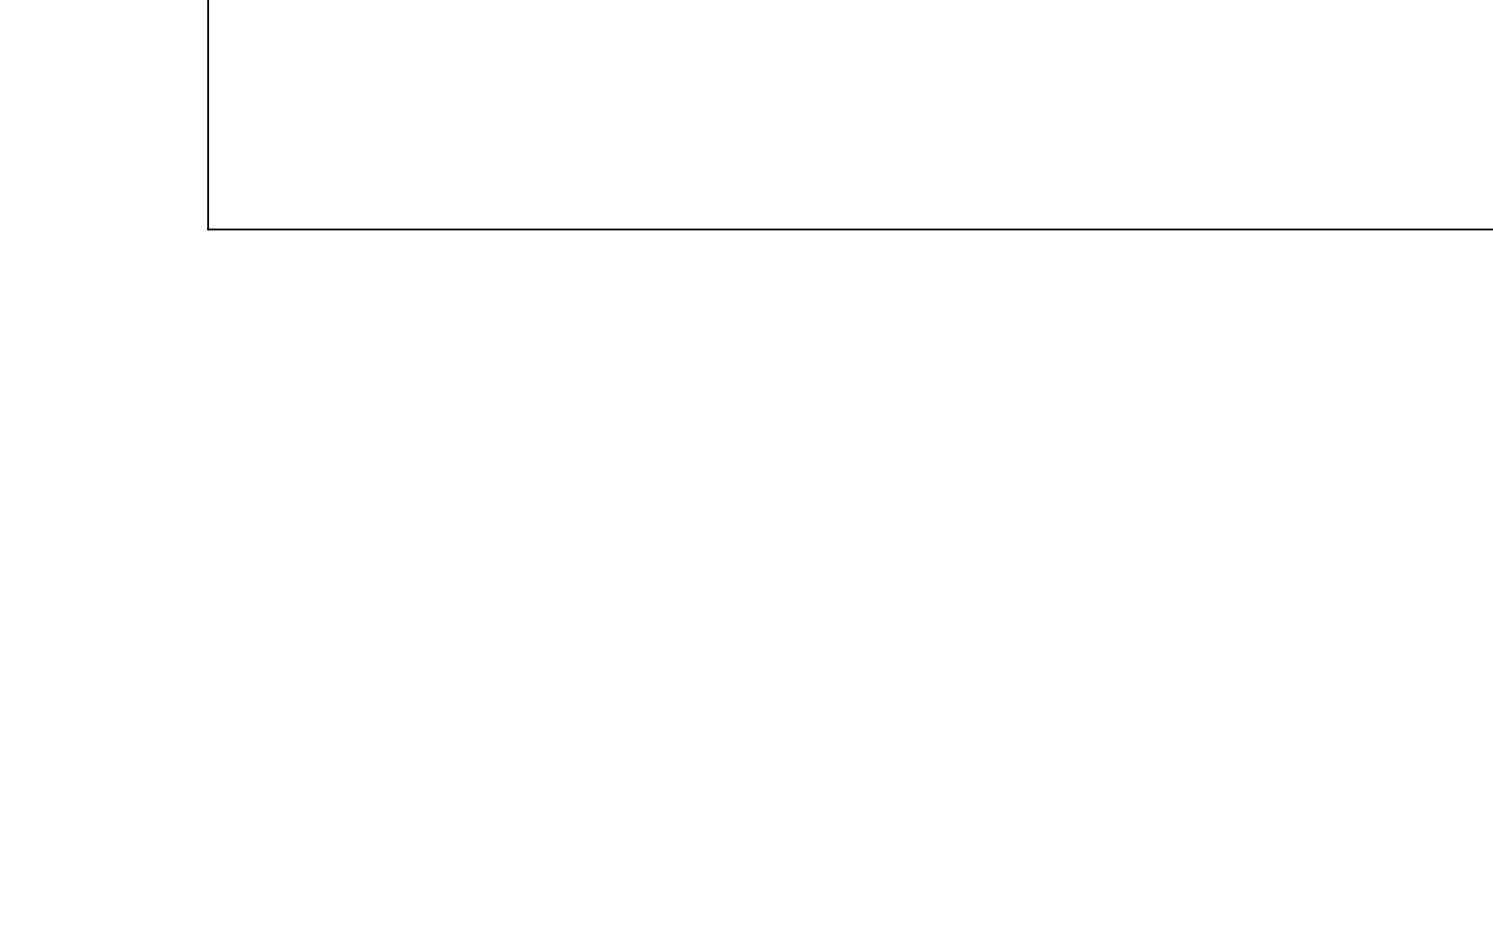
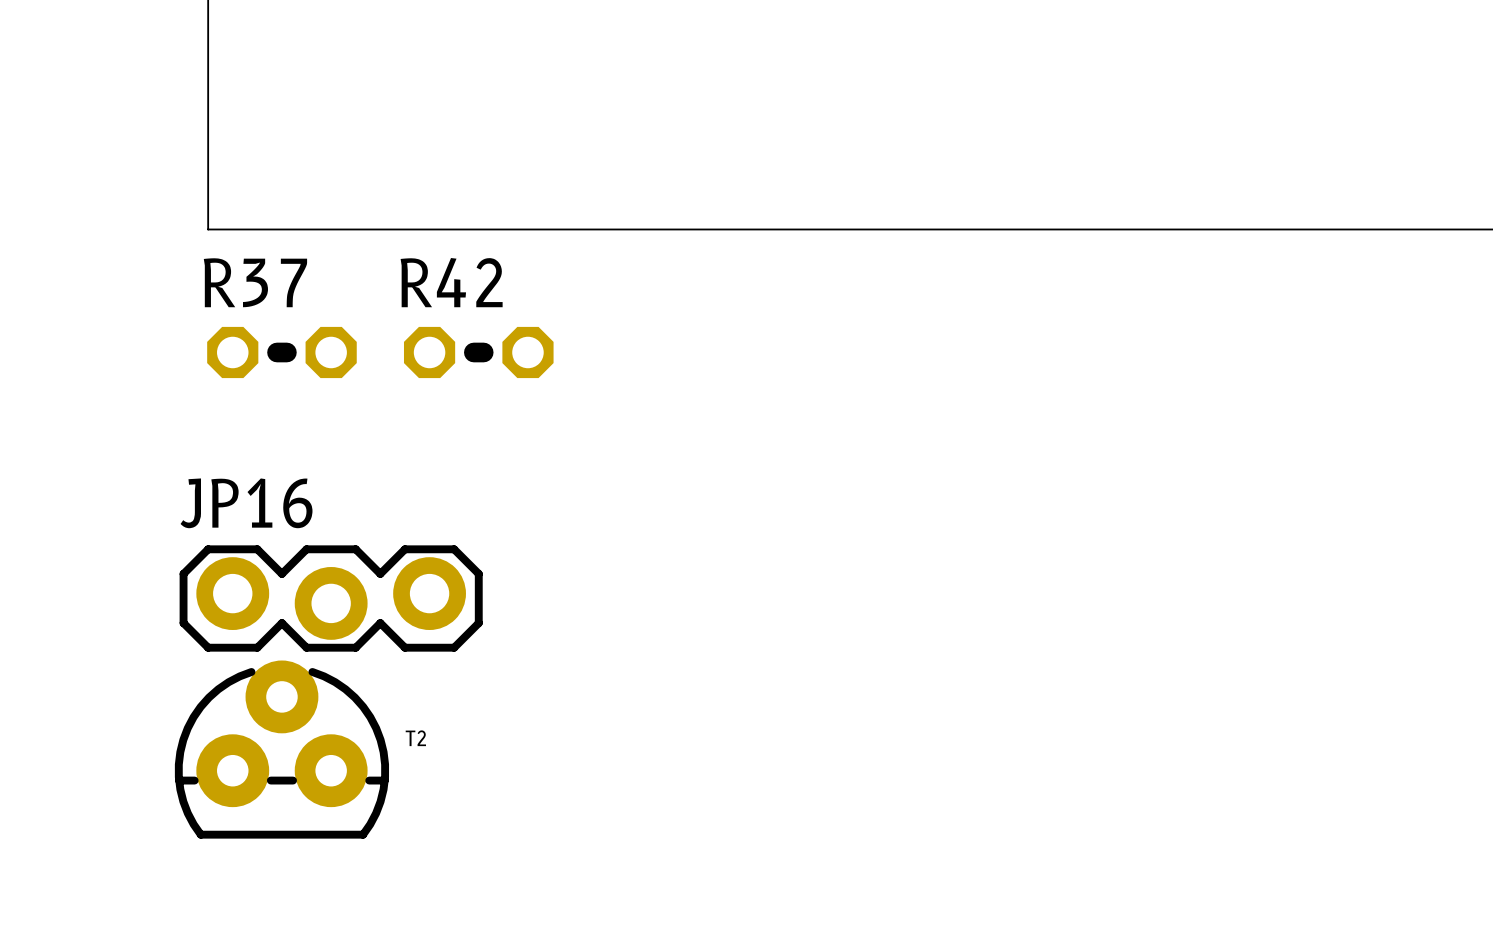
R37: none -> (281, 352)
R42: none -> (478, 352)
JP16: none -> (331, 598)
T2: none -> (281, 749)

